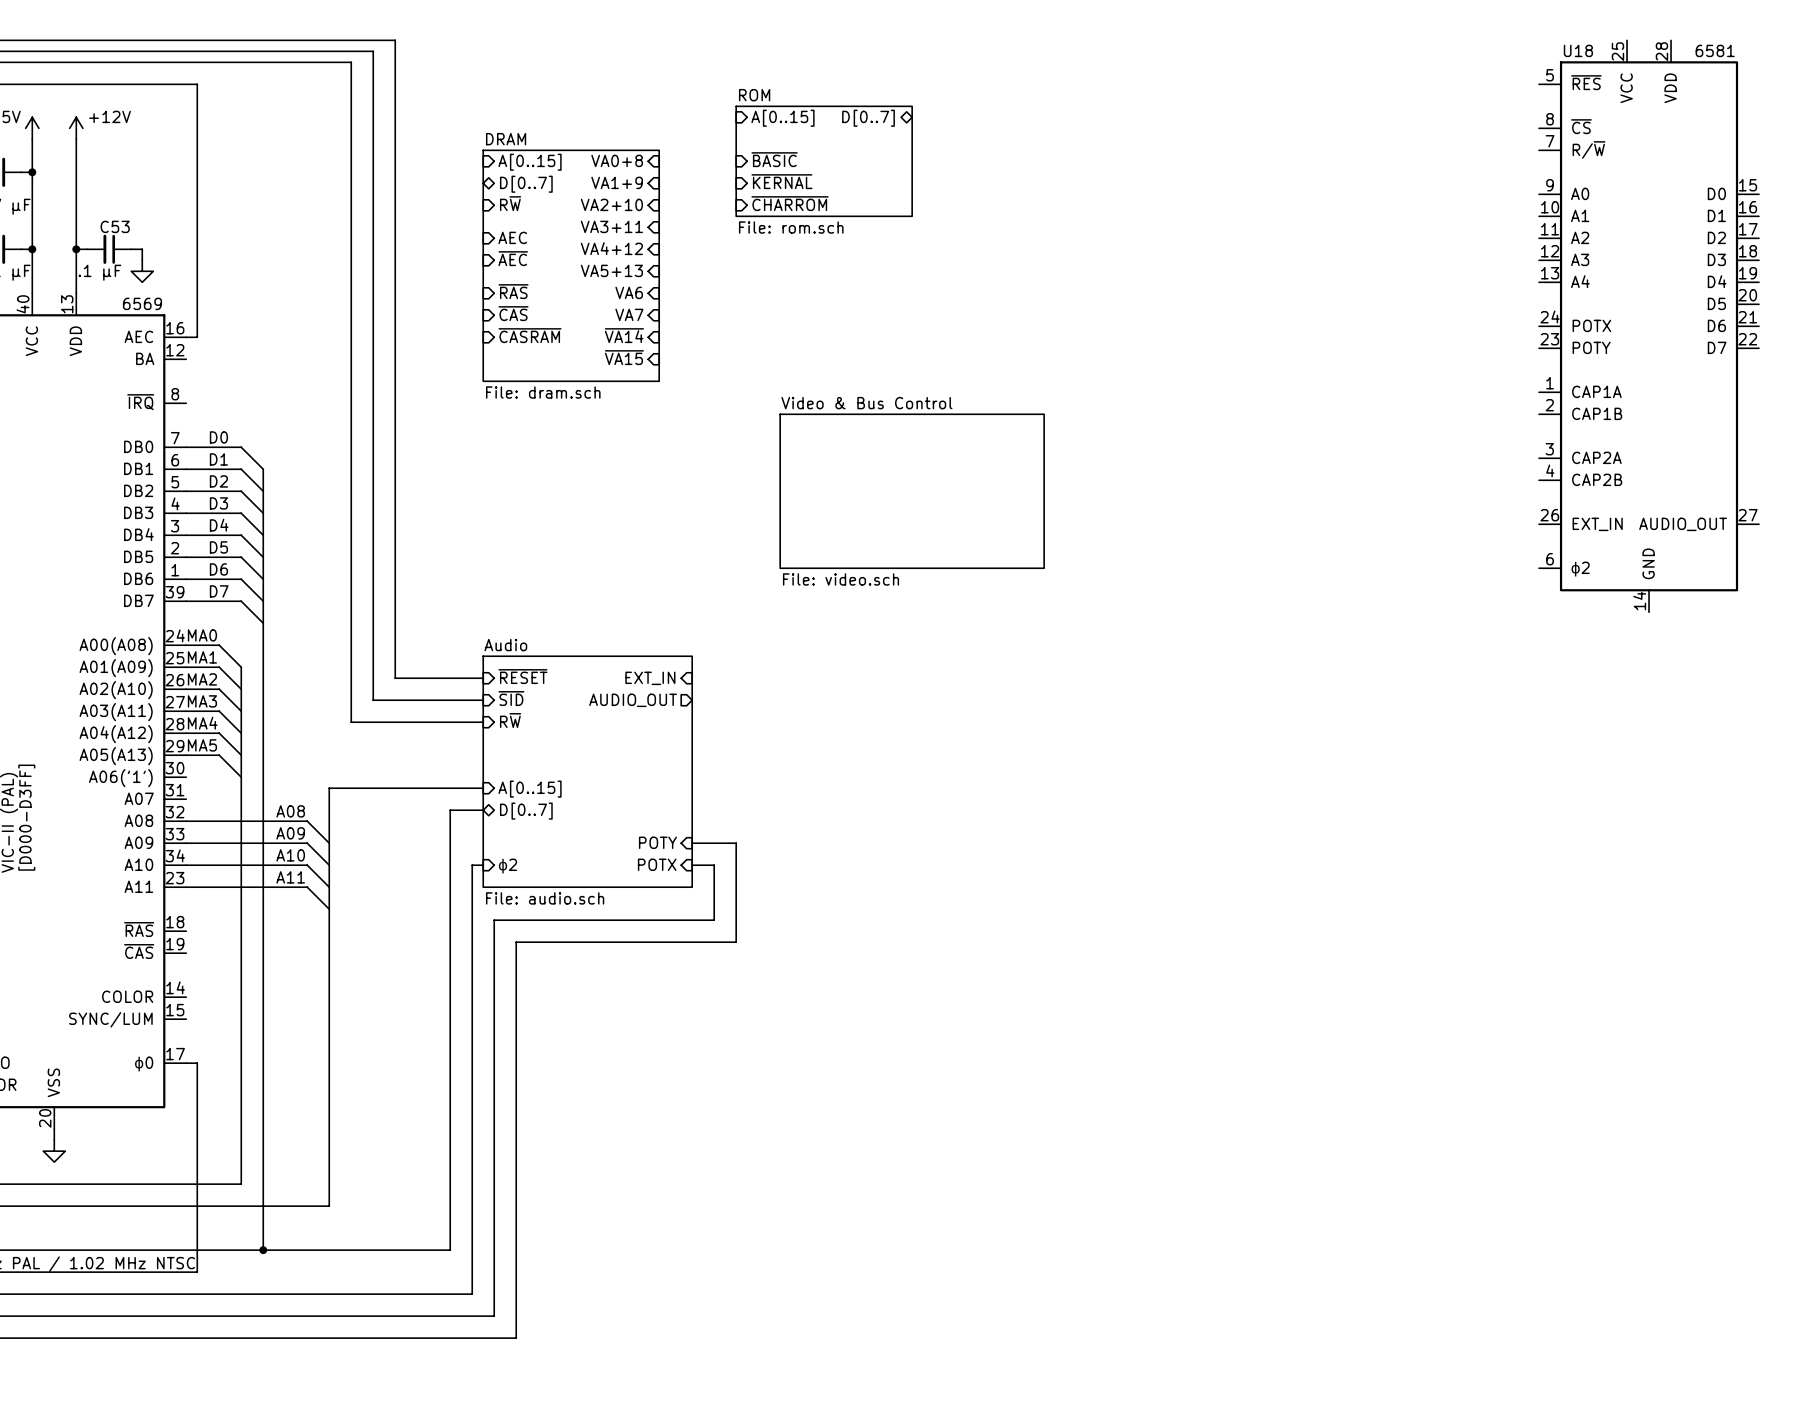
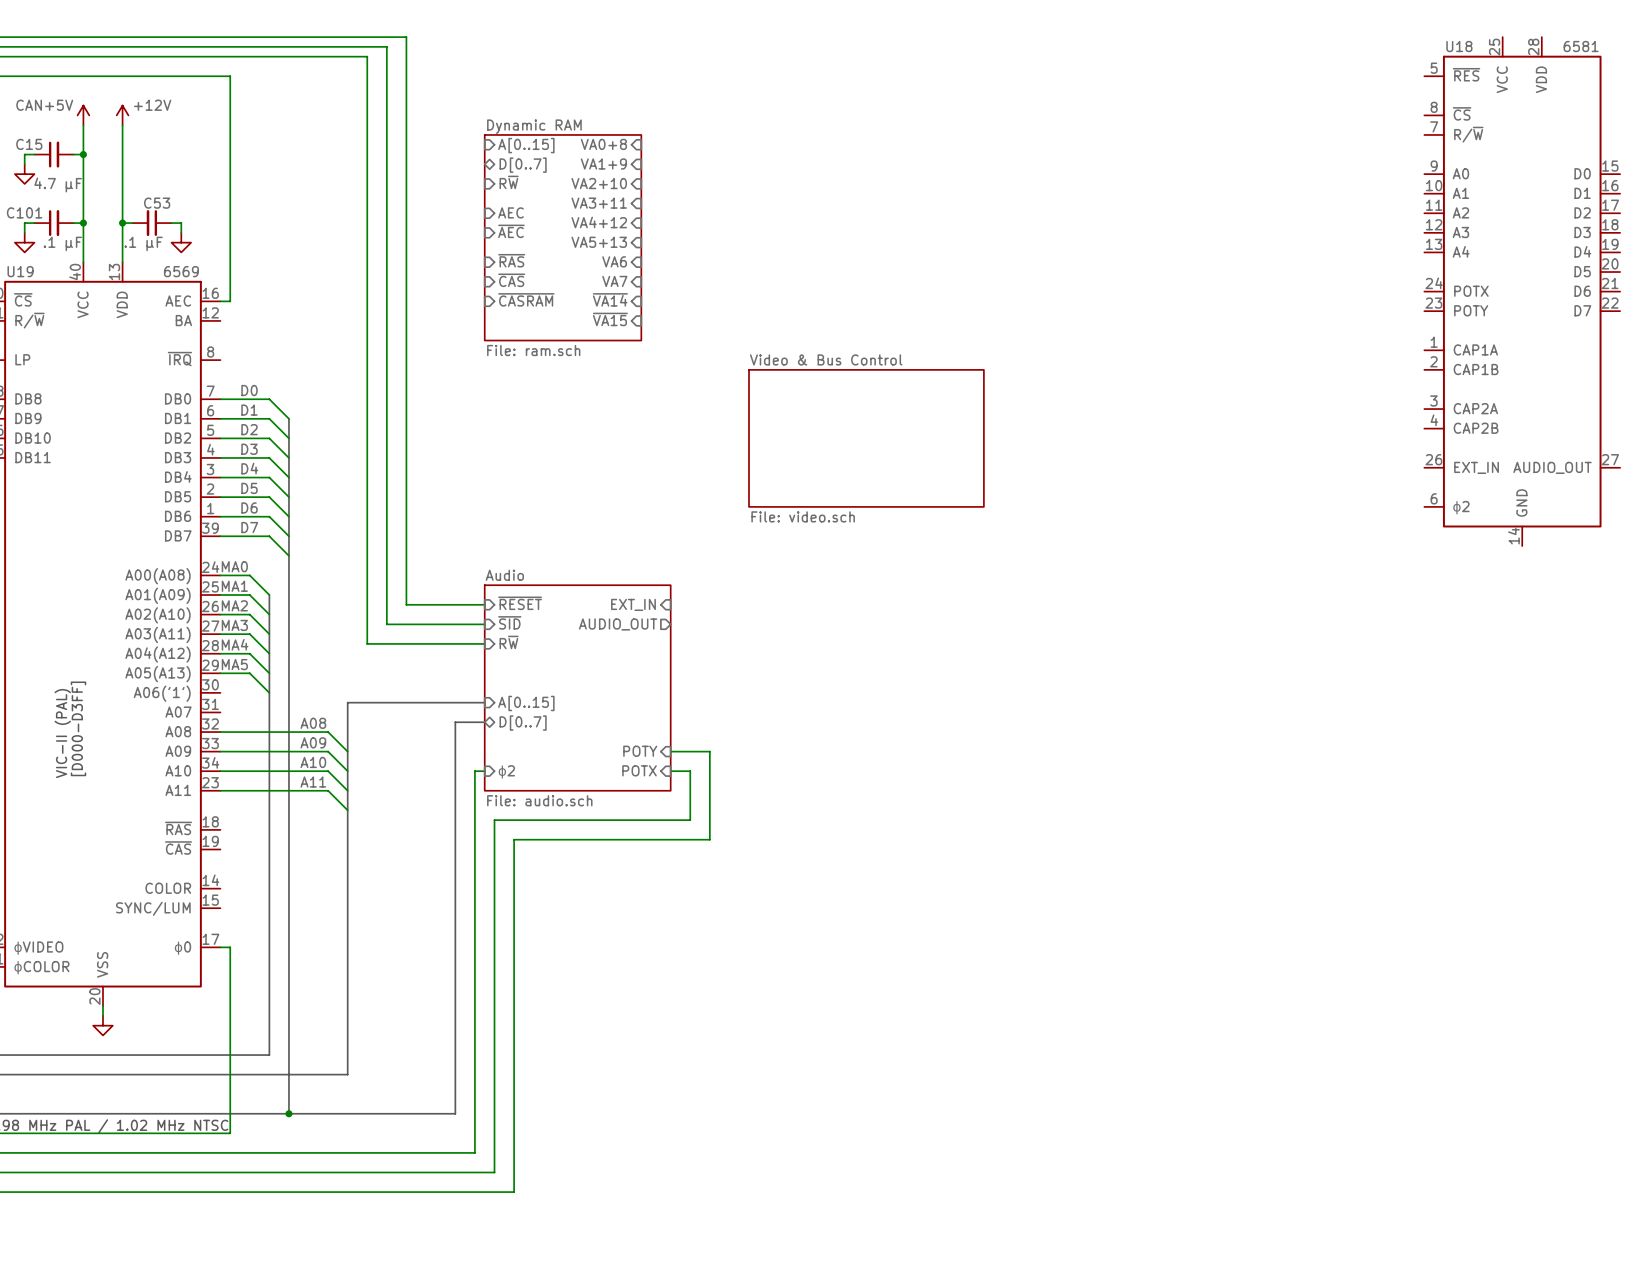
sheet pin: A[0..15] (782, 118) -> none
sheet pin: D[0..7] (868, 118) -> none
sheet DRAM name: DRAM (506, 139) -> Dynamic RAM (534, 126)
sheet pin: ~{BASIC} (774, 159) -> none
sheet ROM: File: rom.sch (824, 161) -> none
sheet pin: ~{KERNAL} (781, 181) -> none
sheet pin: ~{CHARROM} (790, 203) -> none
sheet DRAM value: File: dram.sch (543, 392) -> File: ram.sch (533, 350)

